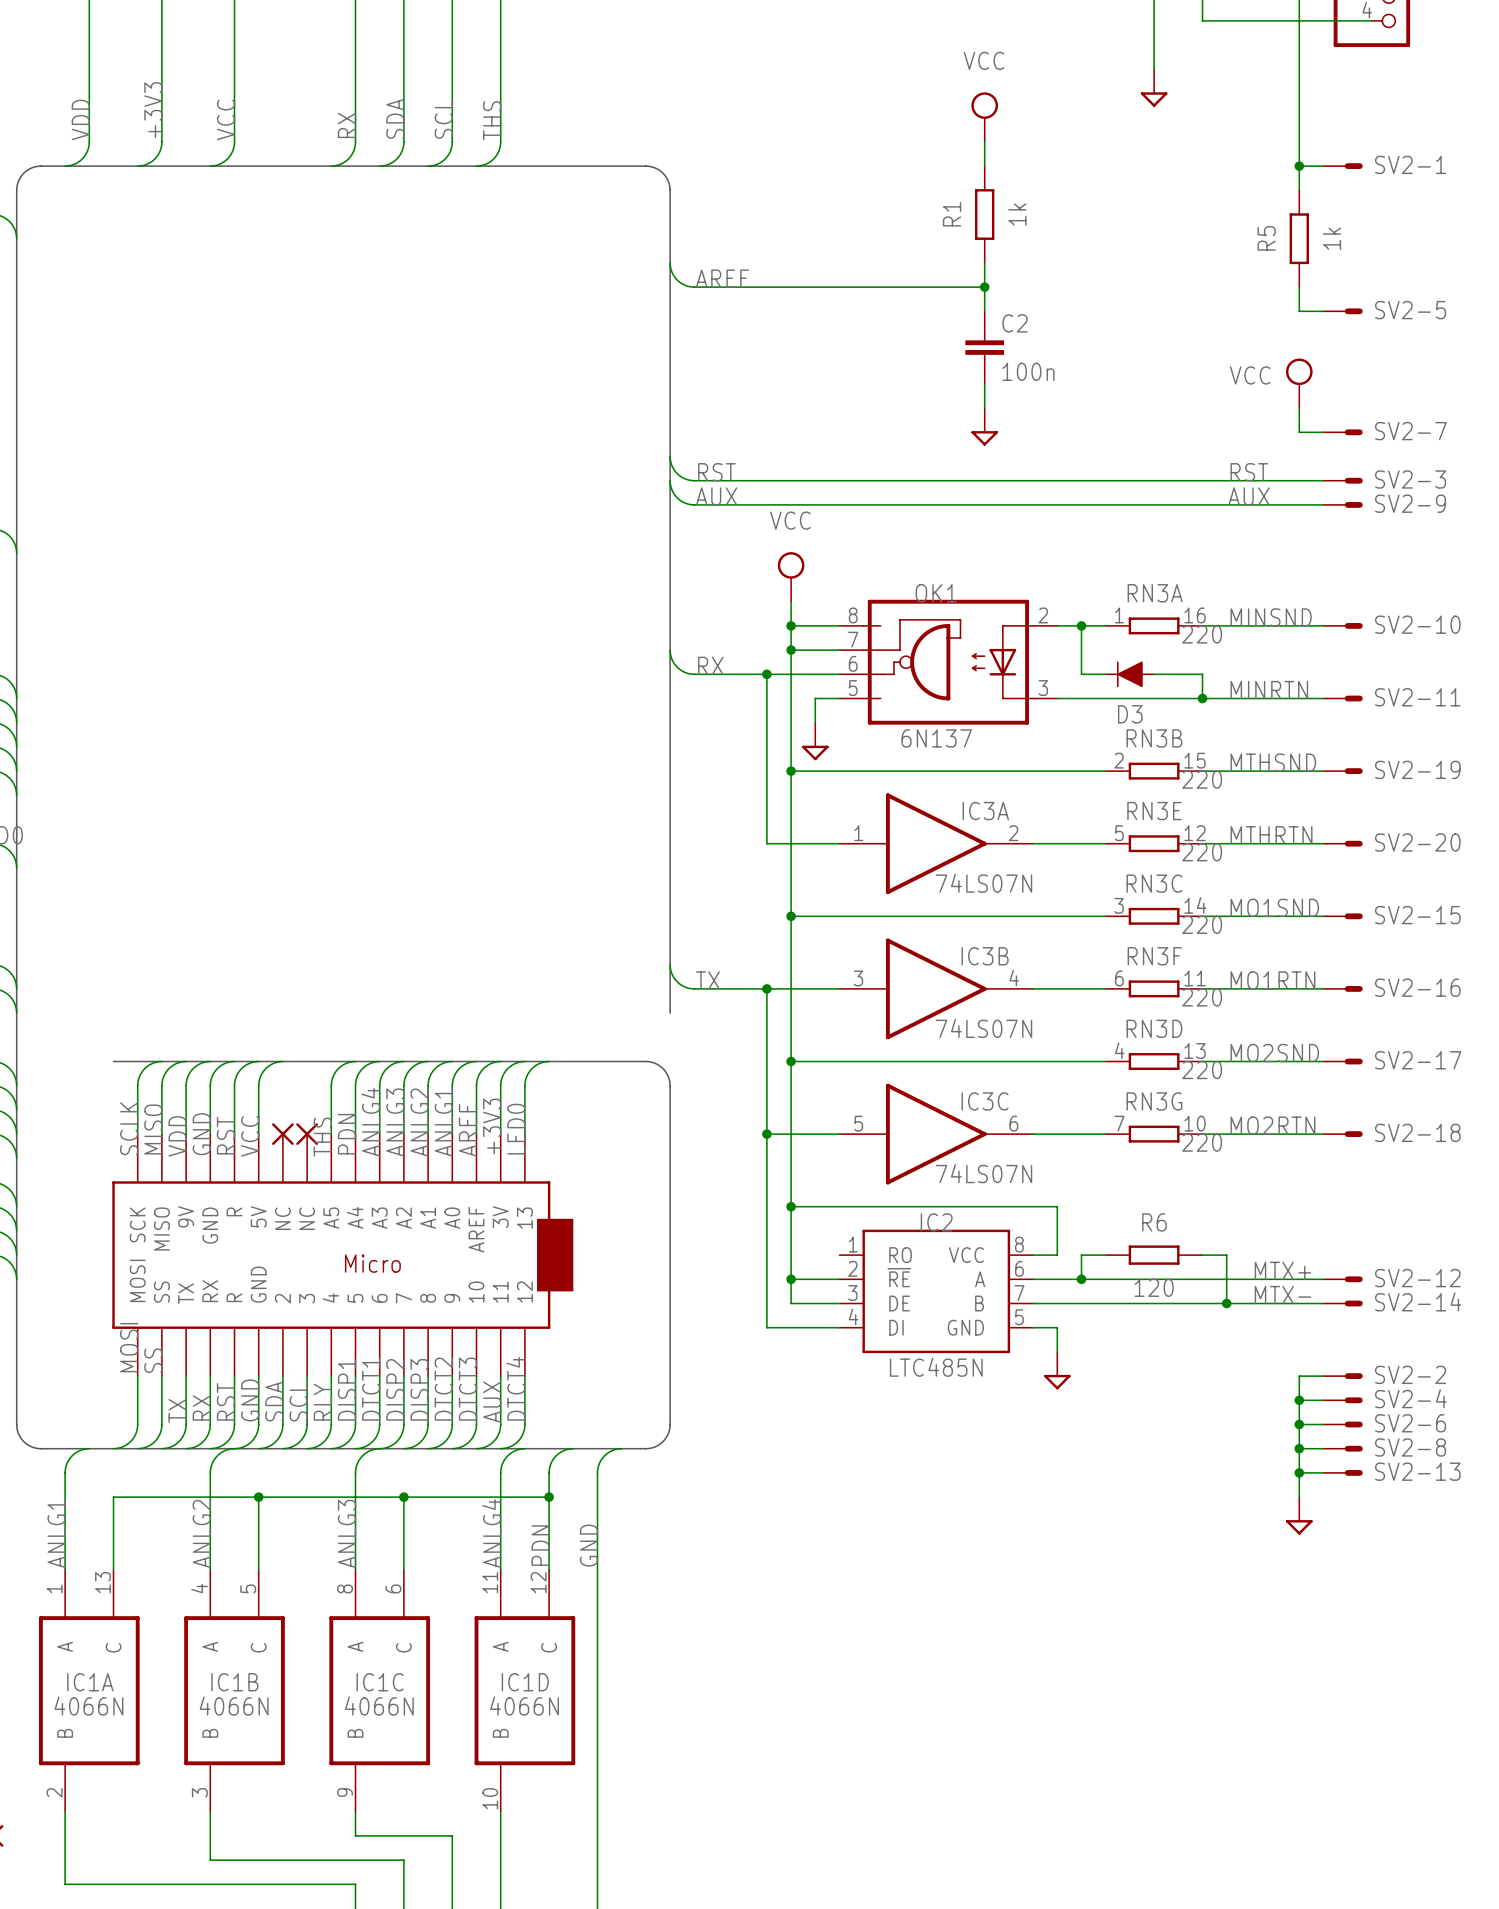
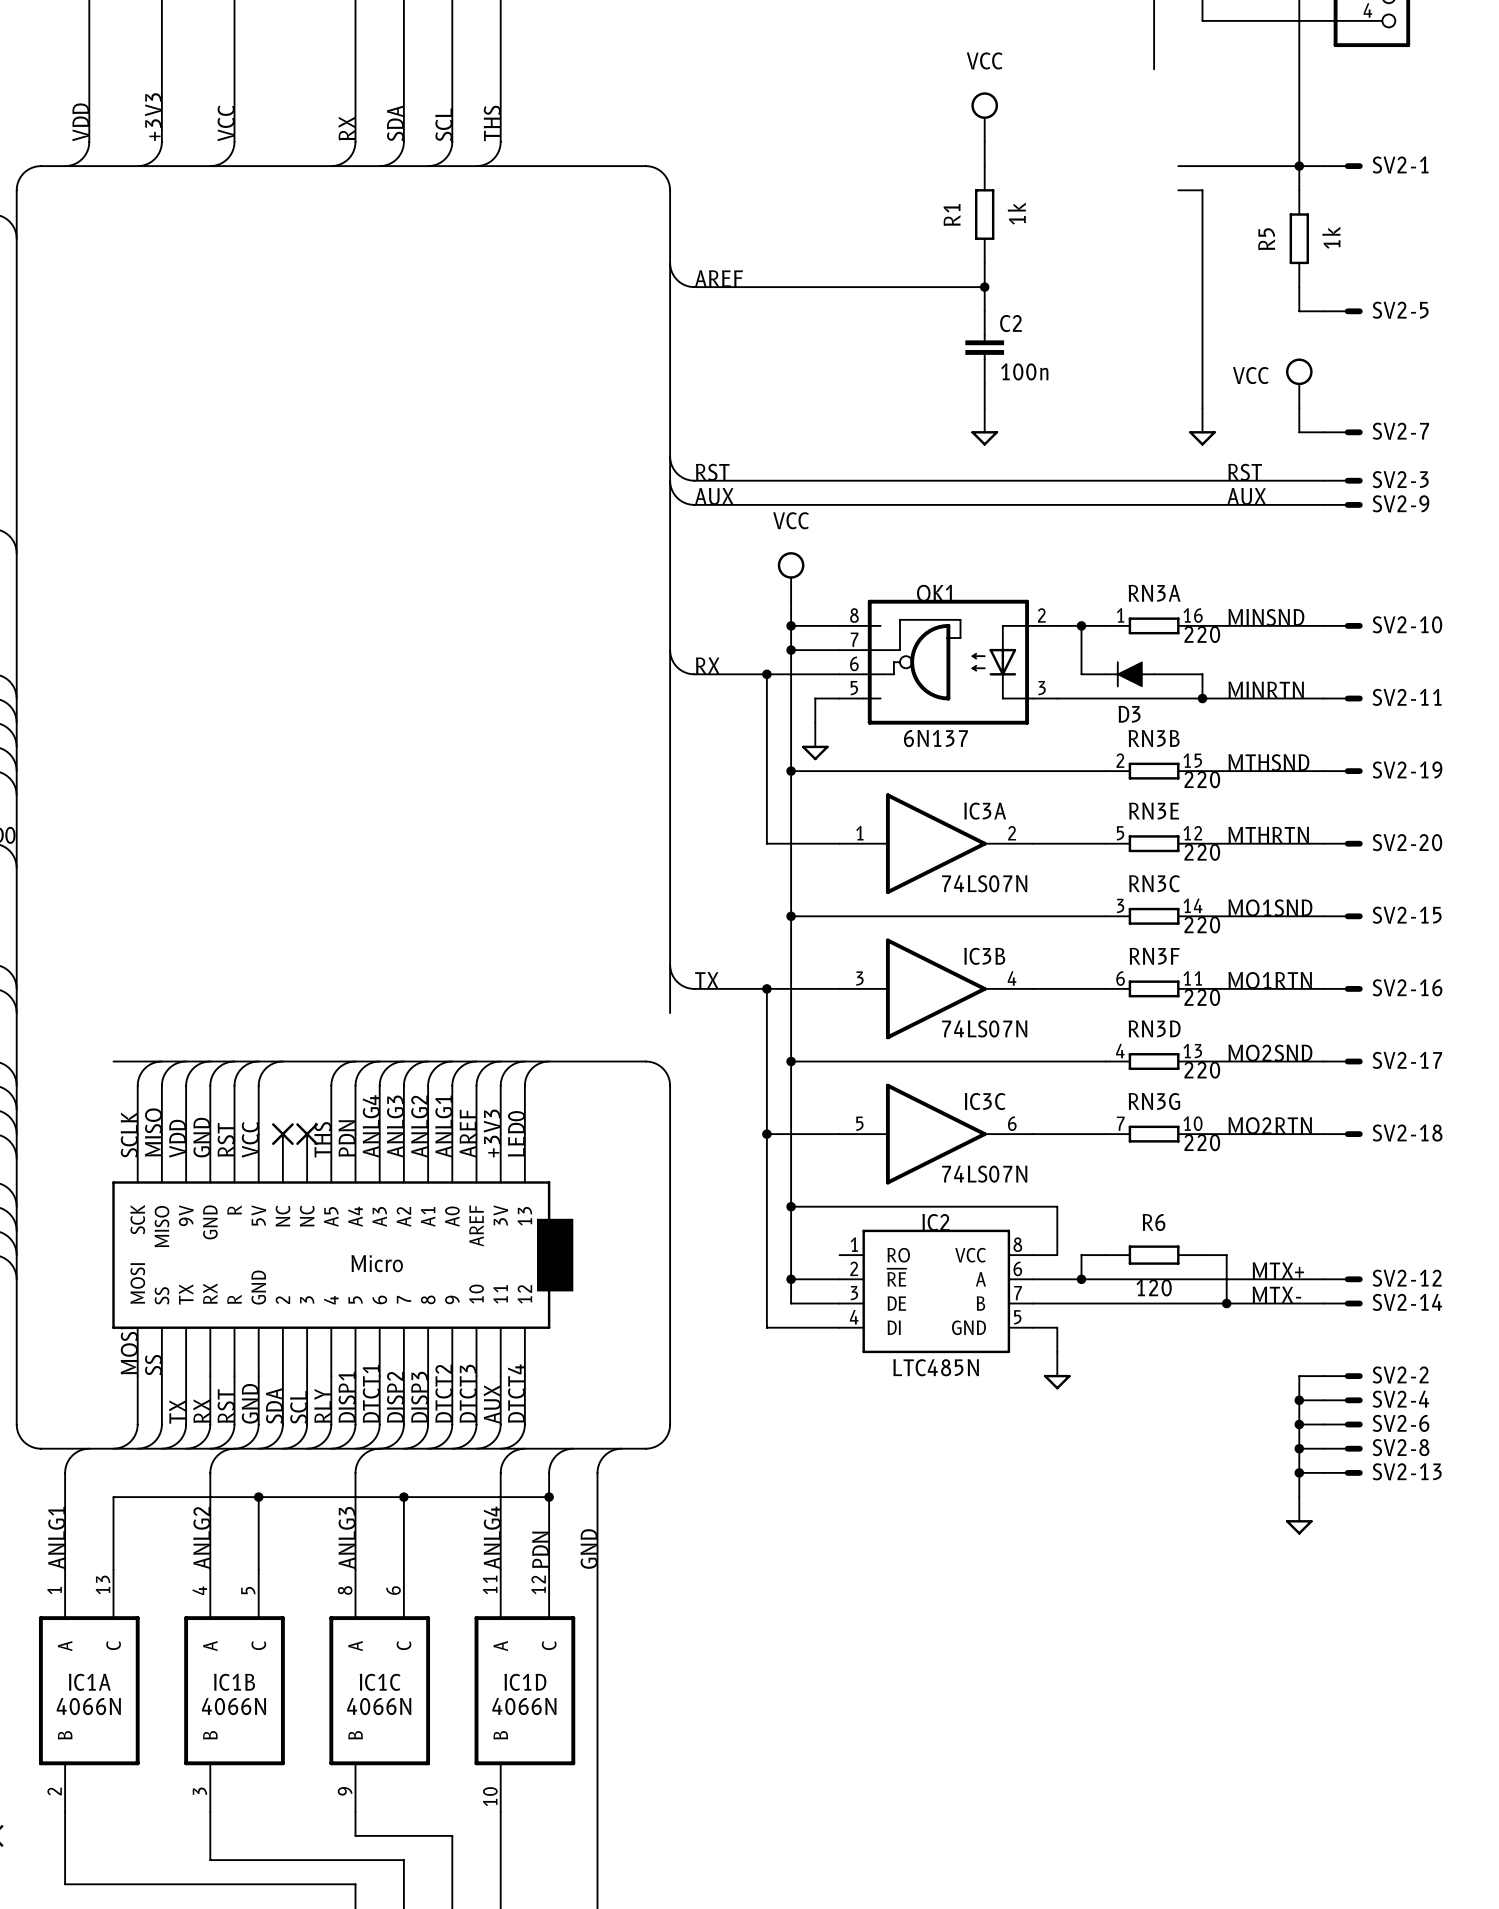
power symbol: (1154, 88) -> none
wire: none -> (1178, 166) (1299, 166)
wire: none -> (1178, 190) (1202, 190) (1202, 408)
power symbol: none -> (1202, 426)

